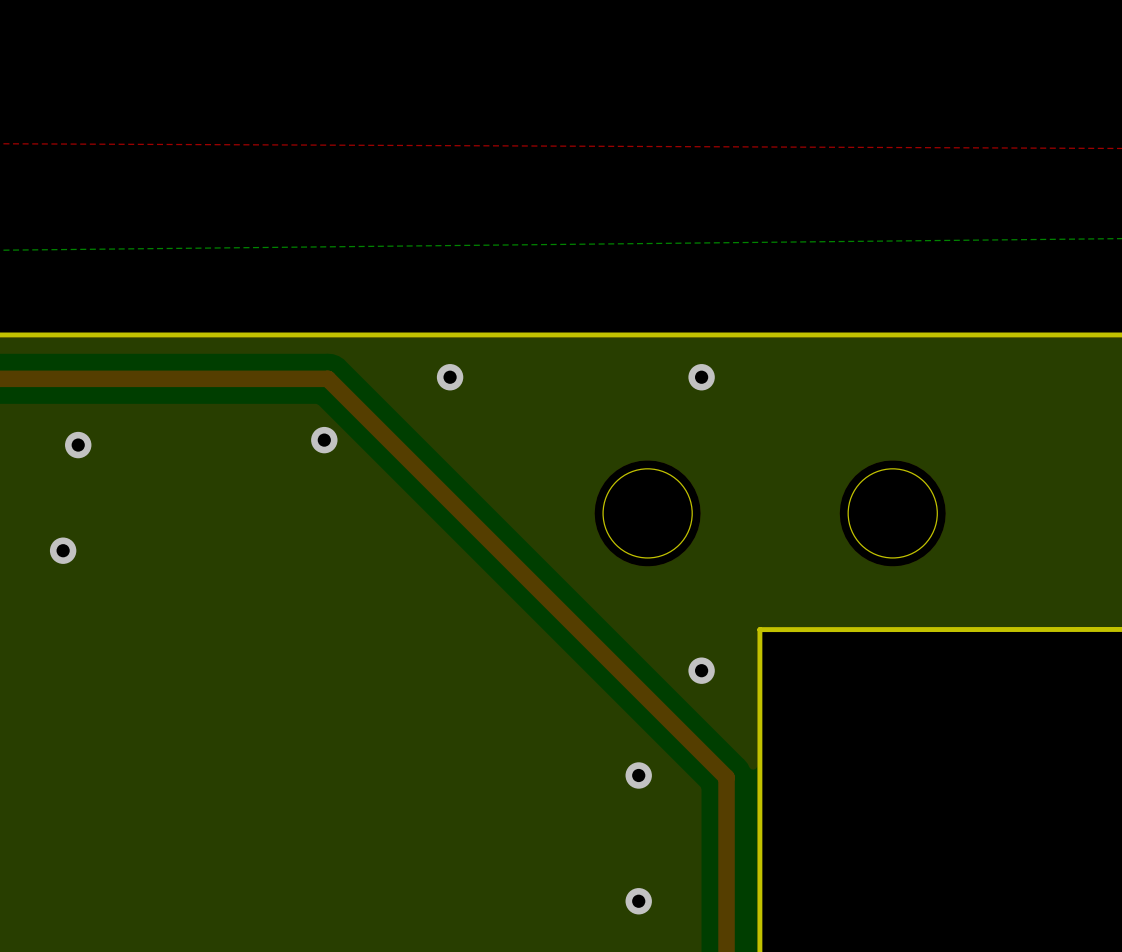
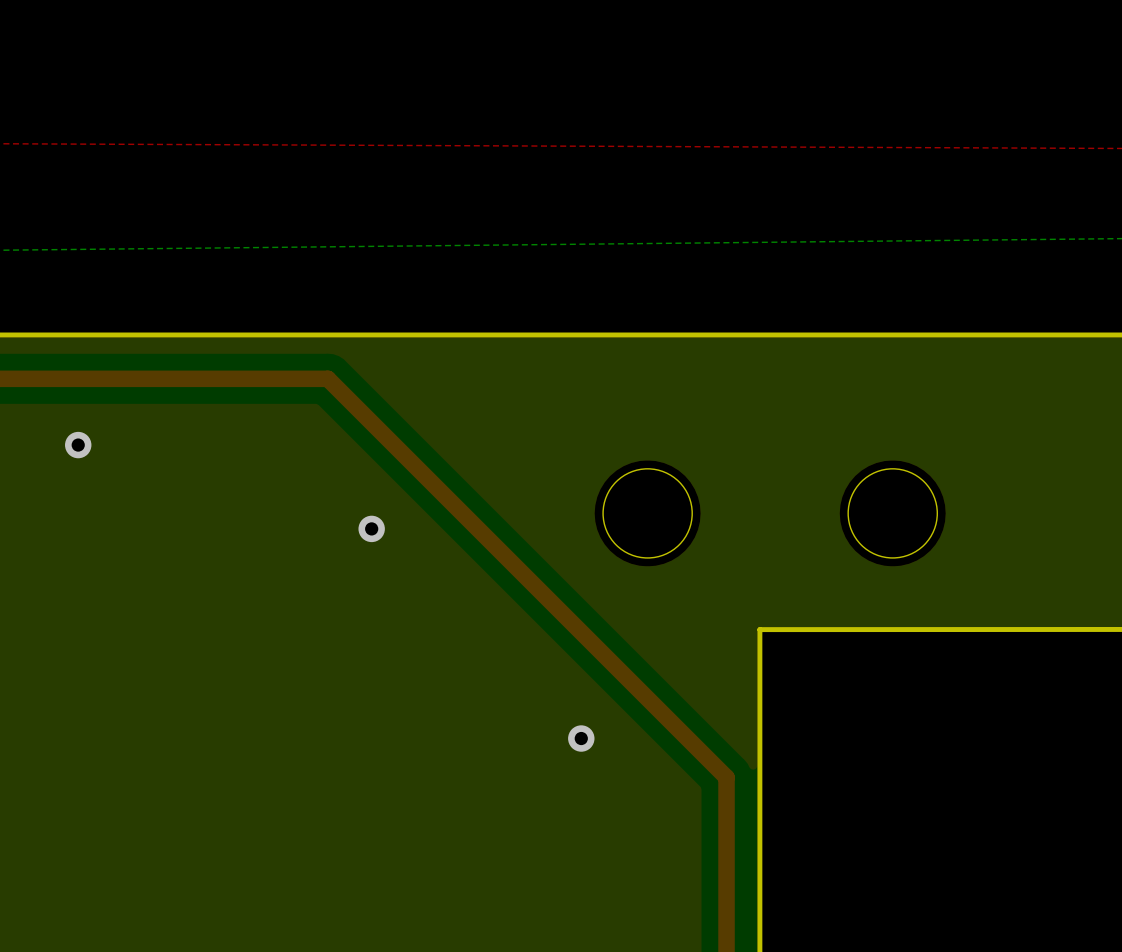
via: (450, 377) -> none
via: (701, 377) -> none
via: (324, 440) -> none
via: none -> (371, 528)
via: (63, 550) -> none
via: (701, 670) -> none
via position: (638, 775) -> (581, 738)
via: (638, 901) -> none

